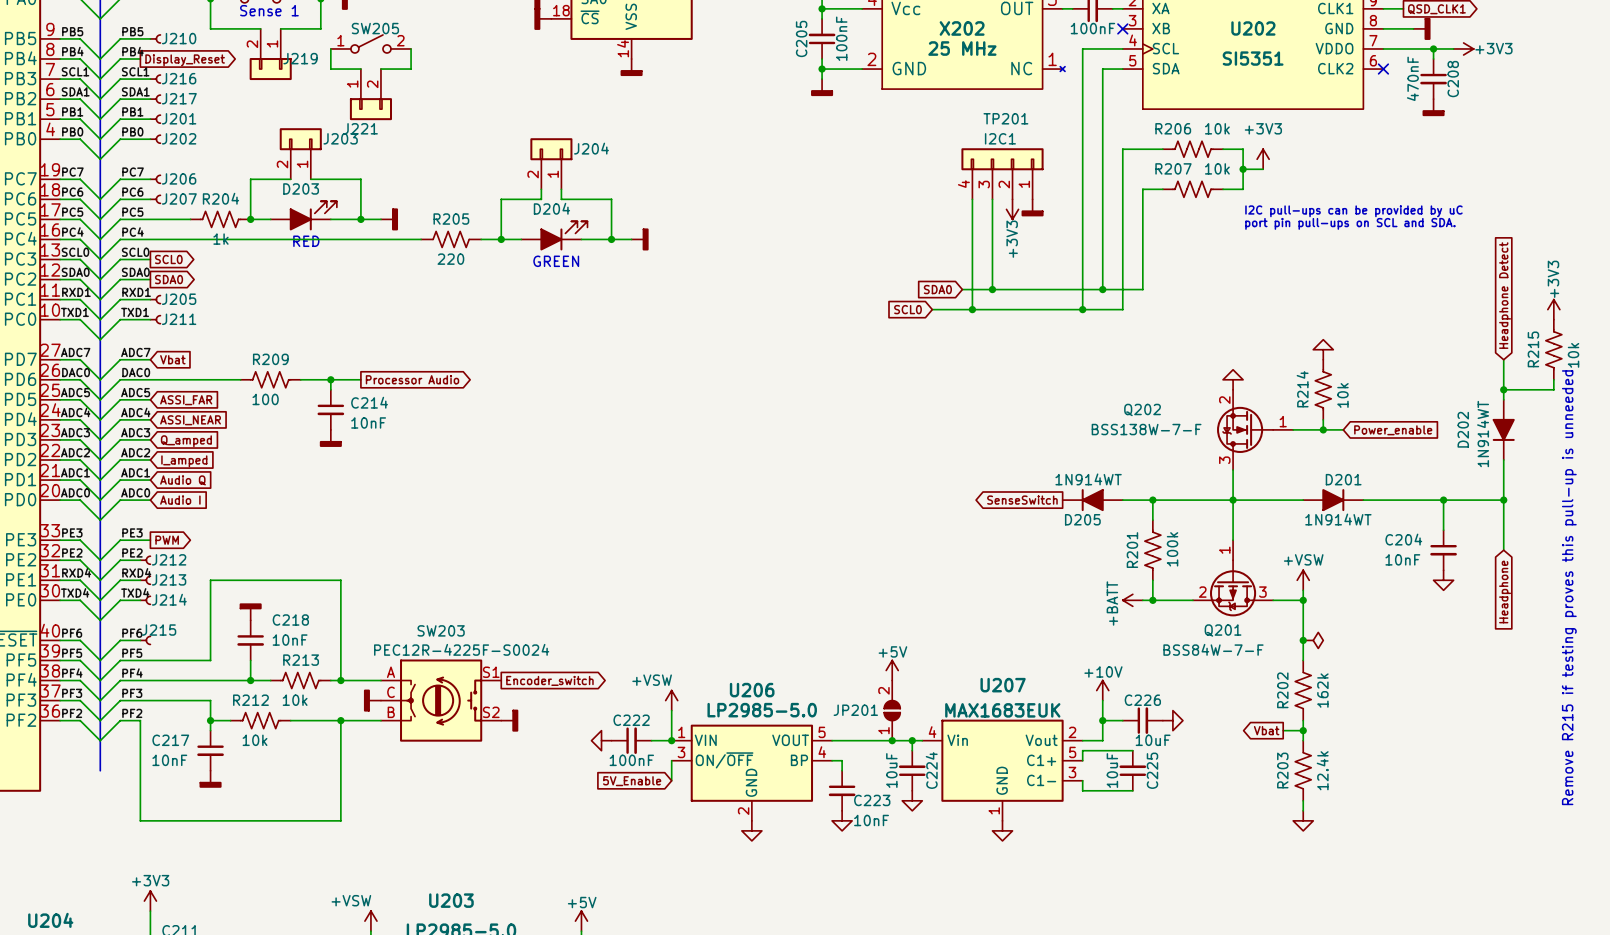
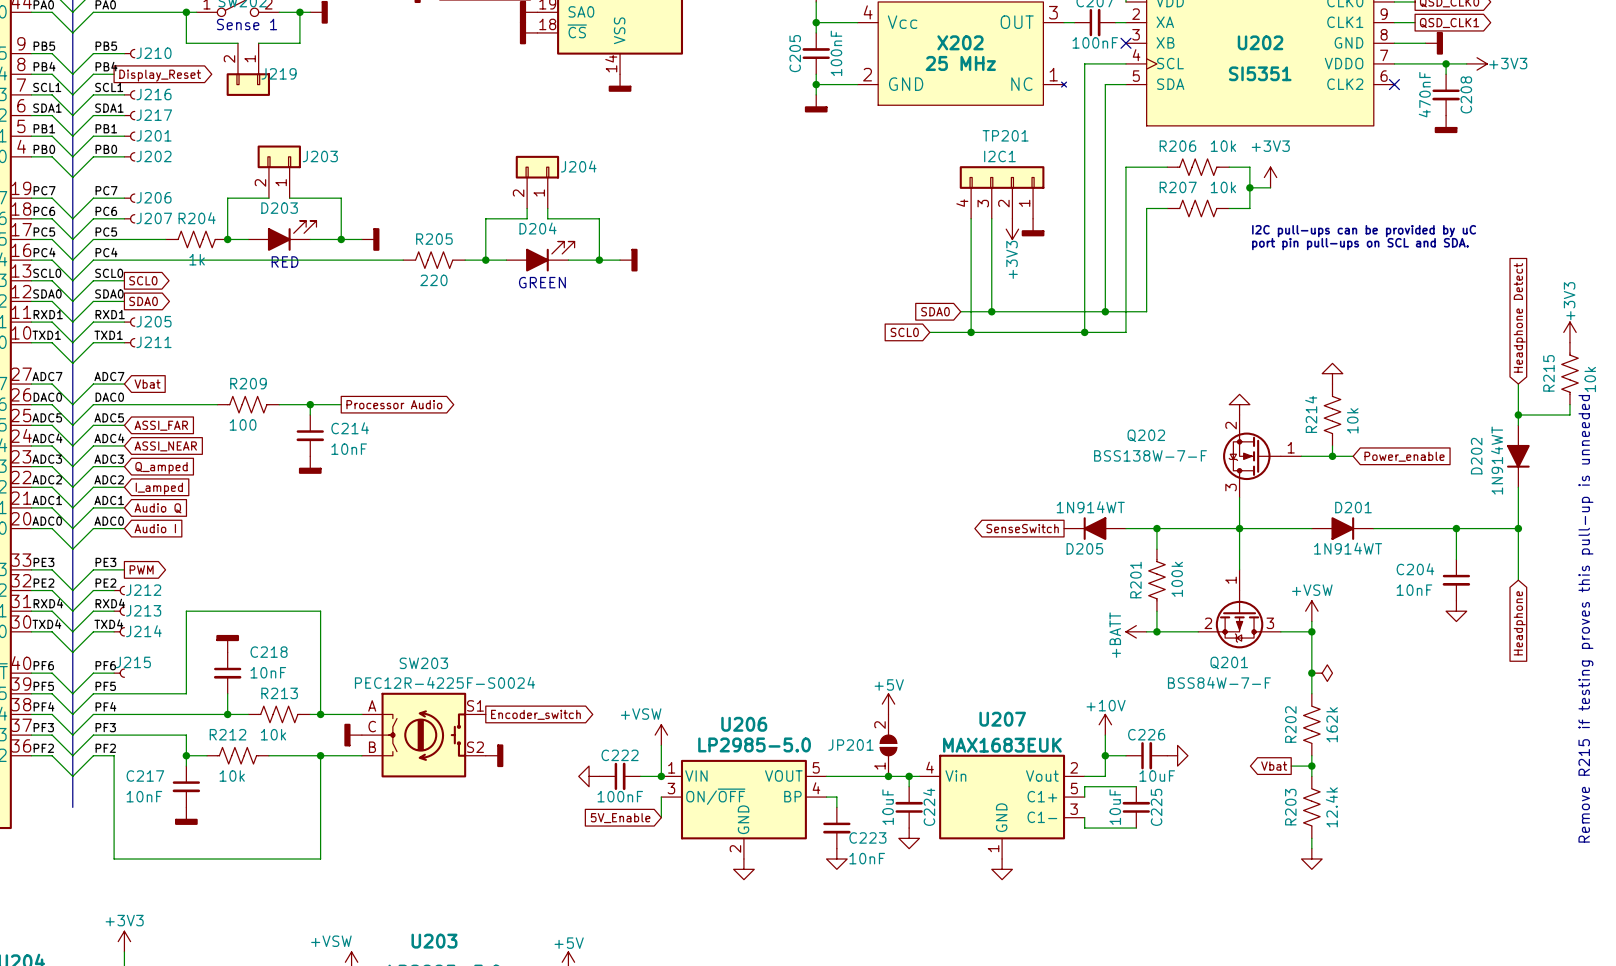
SW205: (370, 43) -> none
wire: (330, 48) (330, 69) (360, 69) -> none
wire: (411, 48) (411, 69) (380, 69) -> none
J221: (370, 94) -> none

